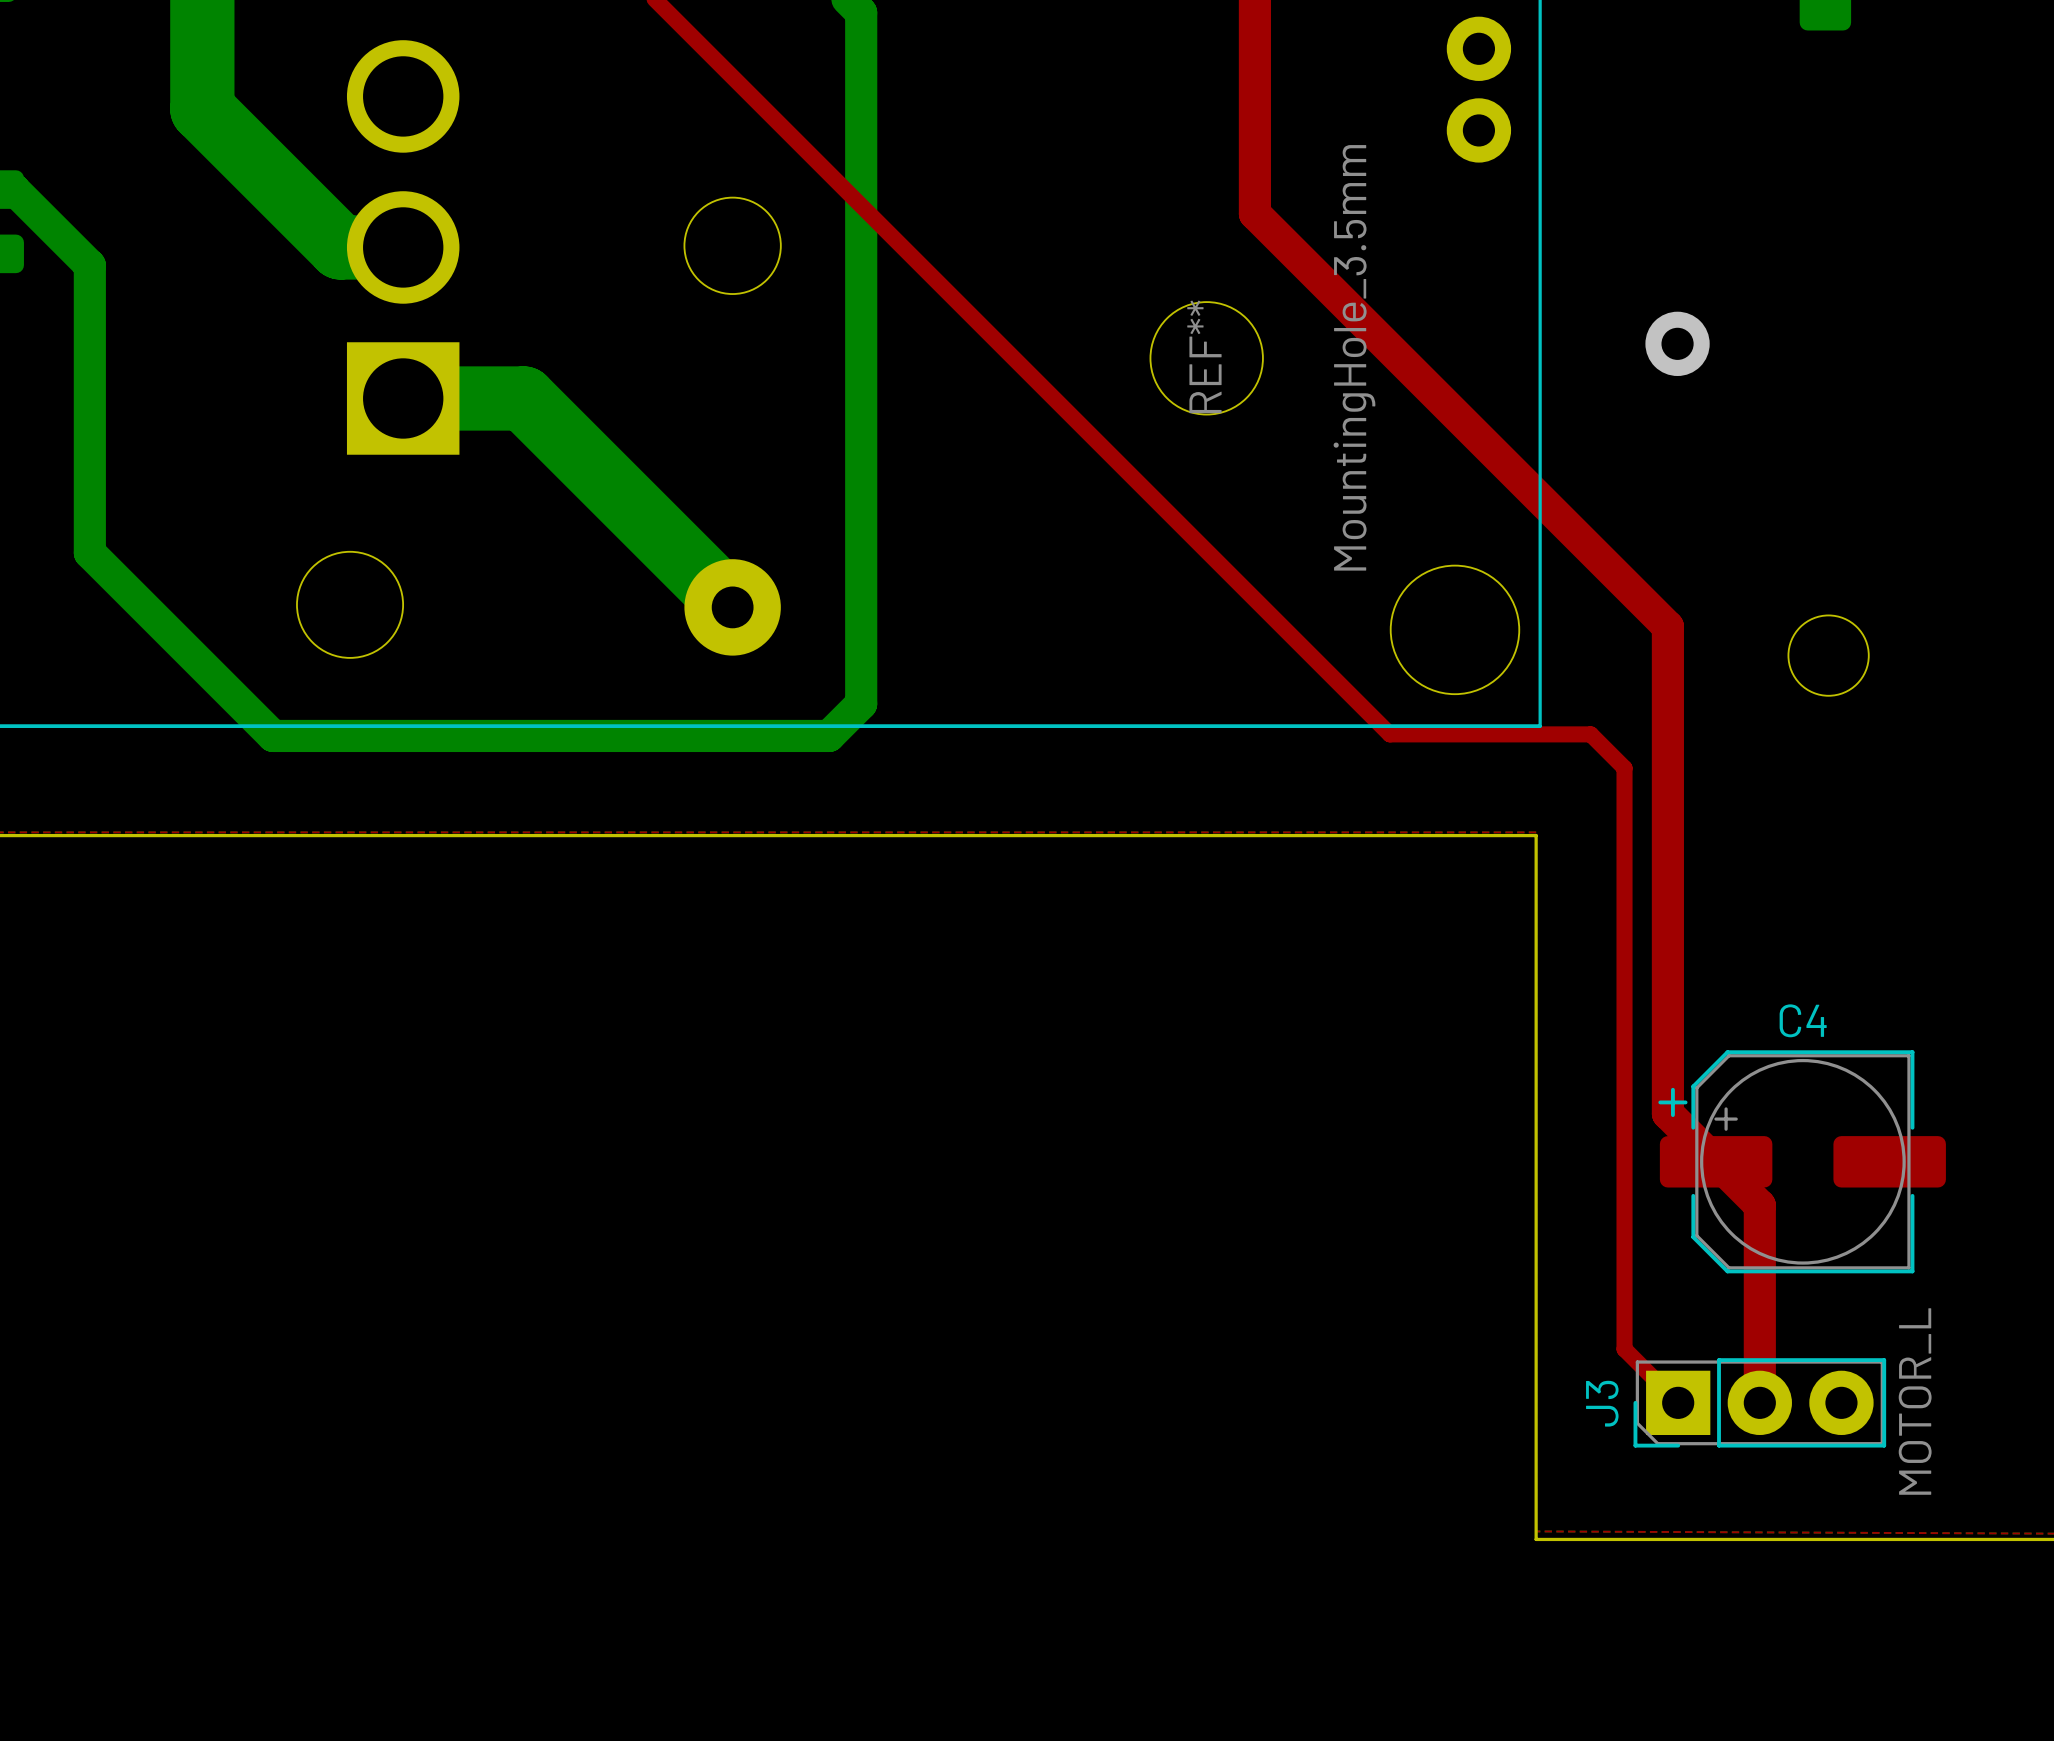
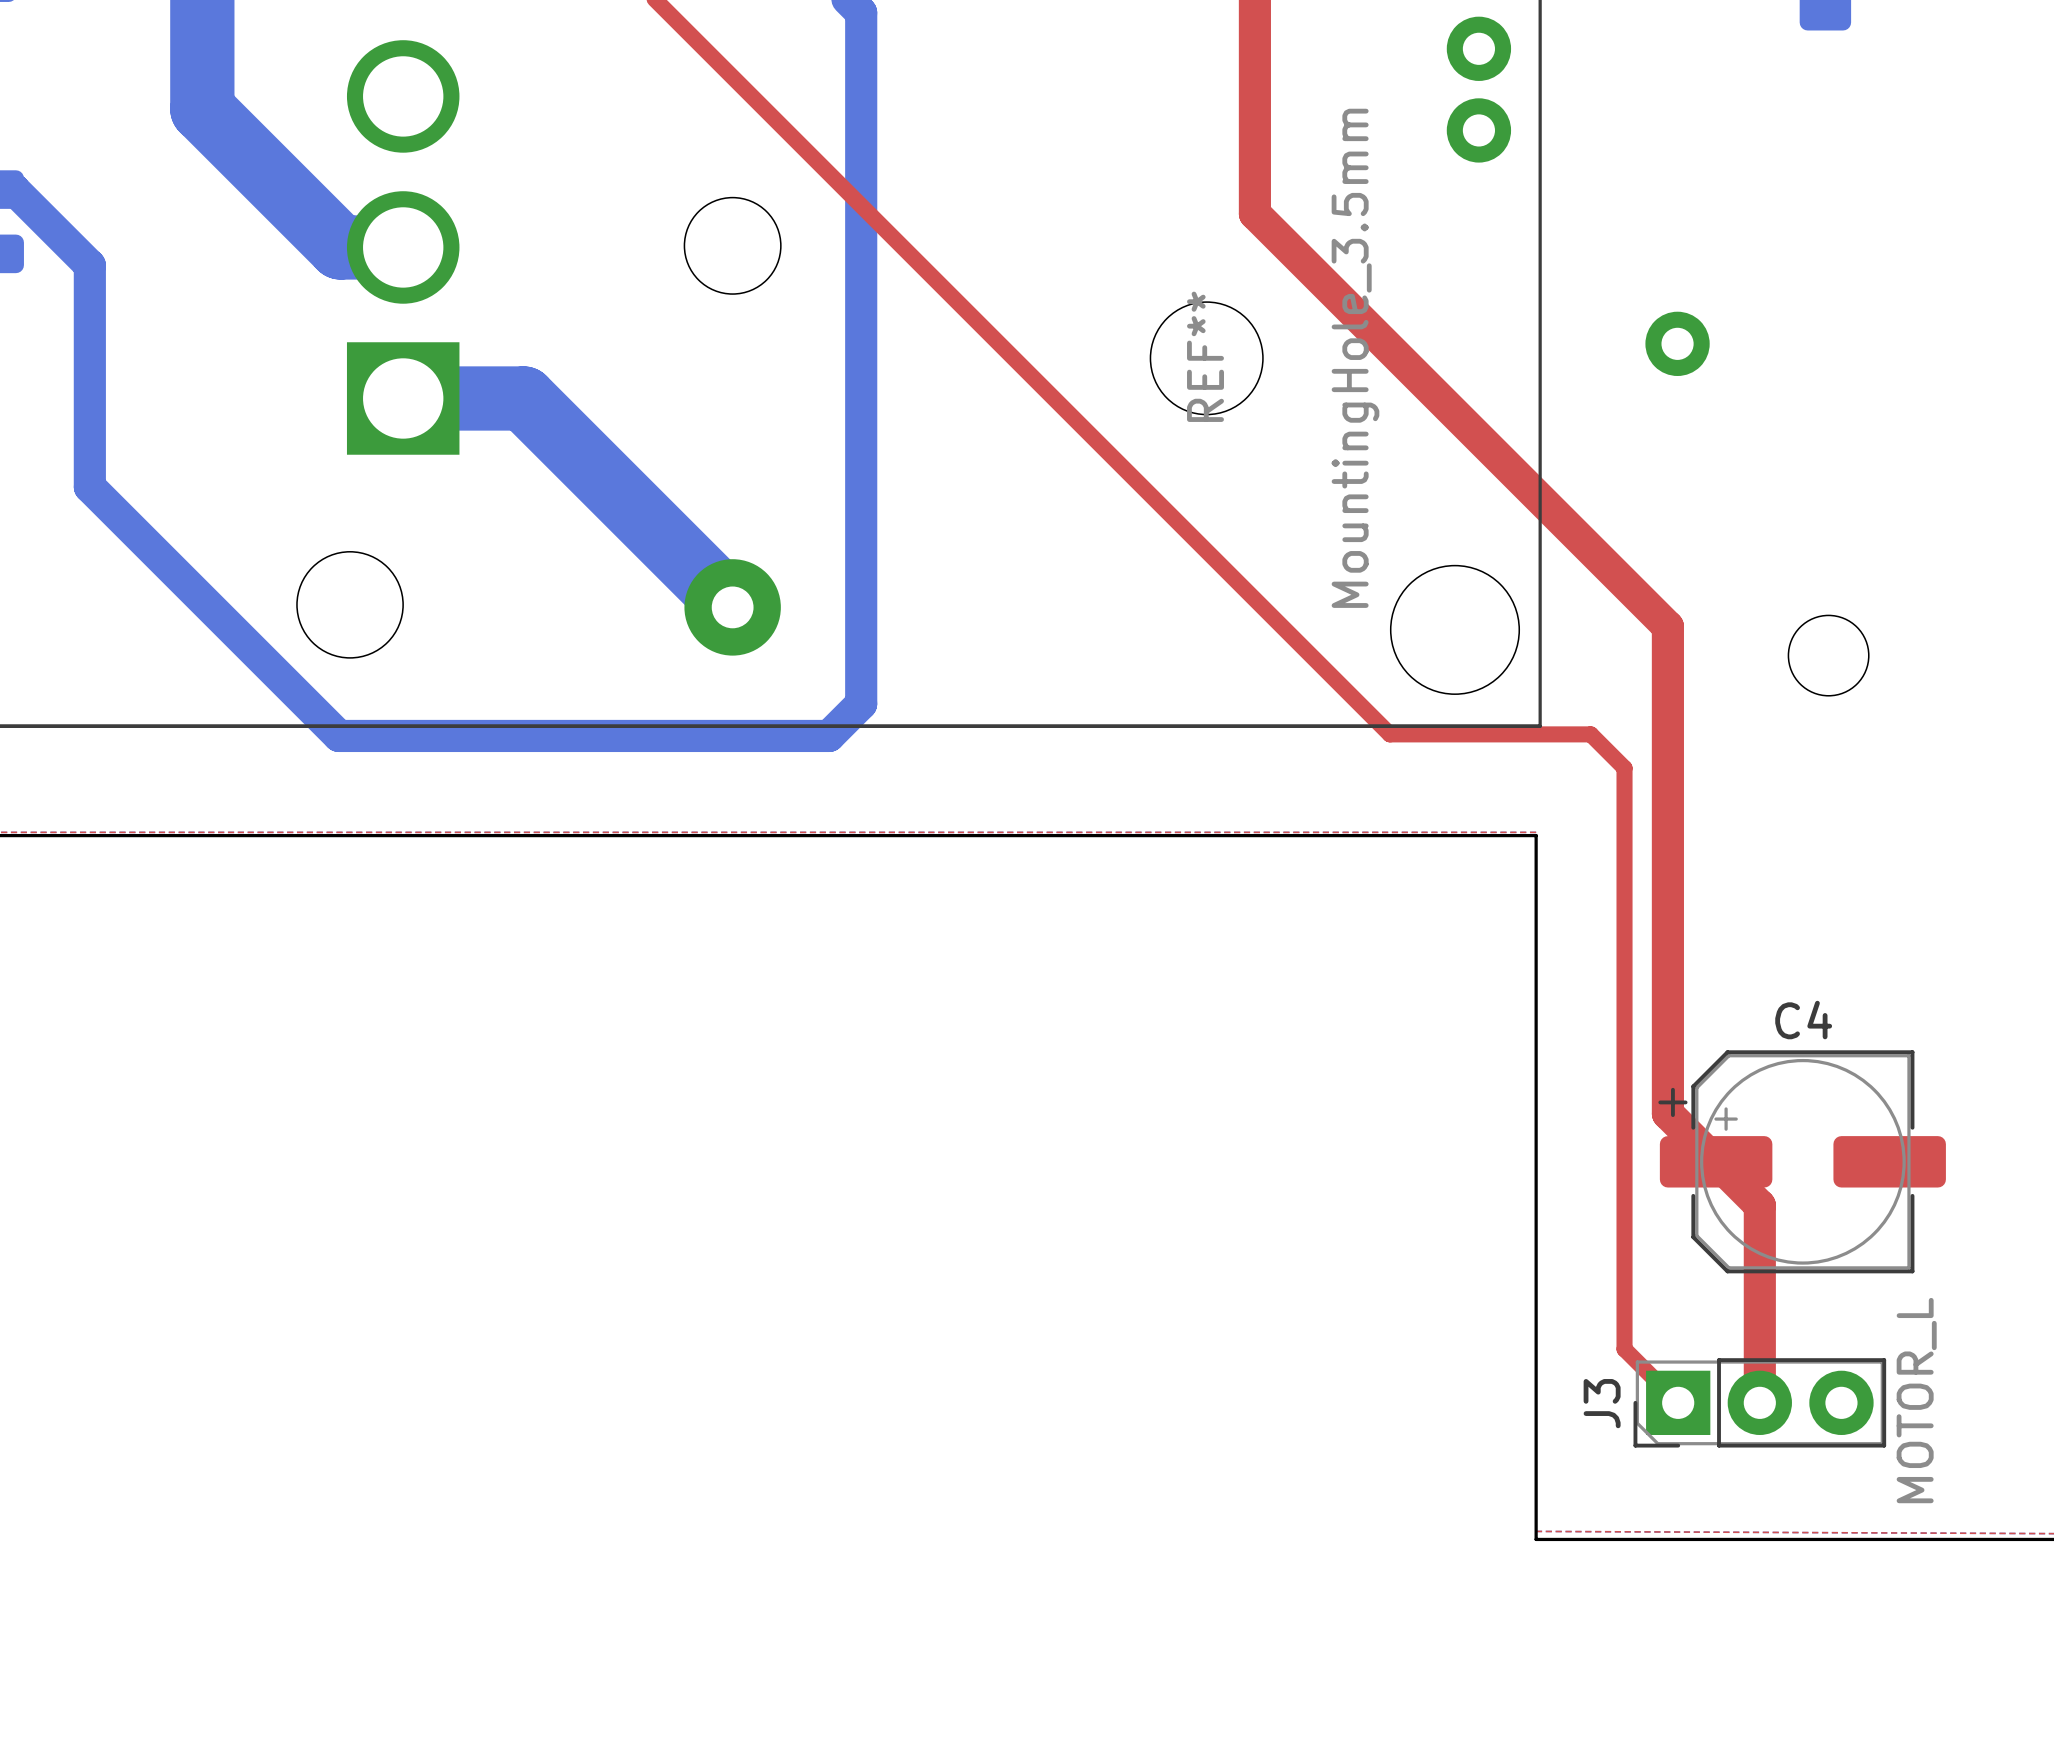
bottom track: (89, 486) (89, 552) (273, 735) (338, 735) -> (89, 486) (338, 735)

